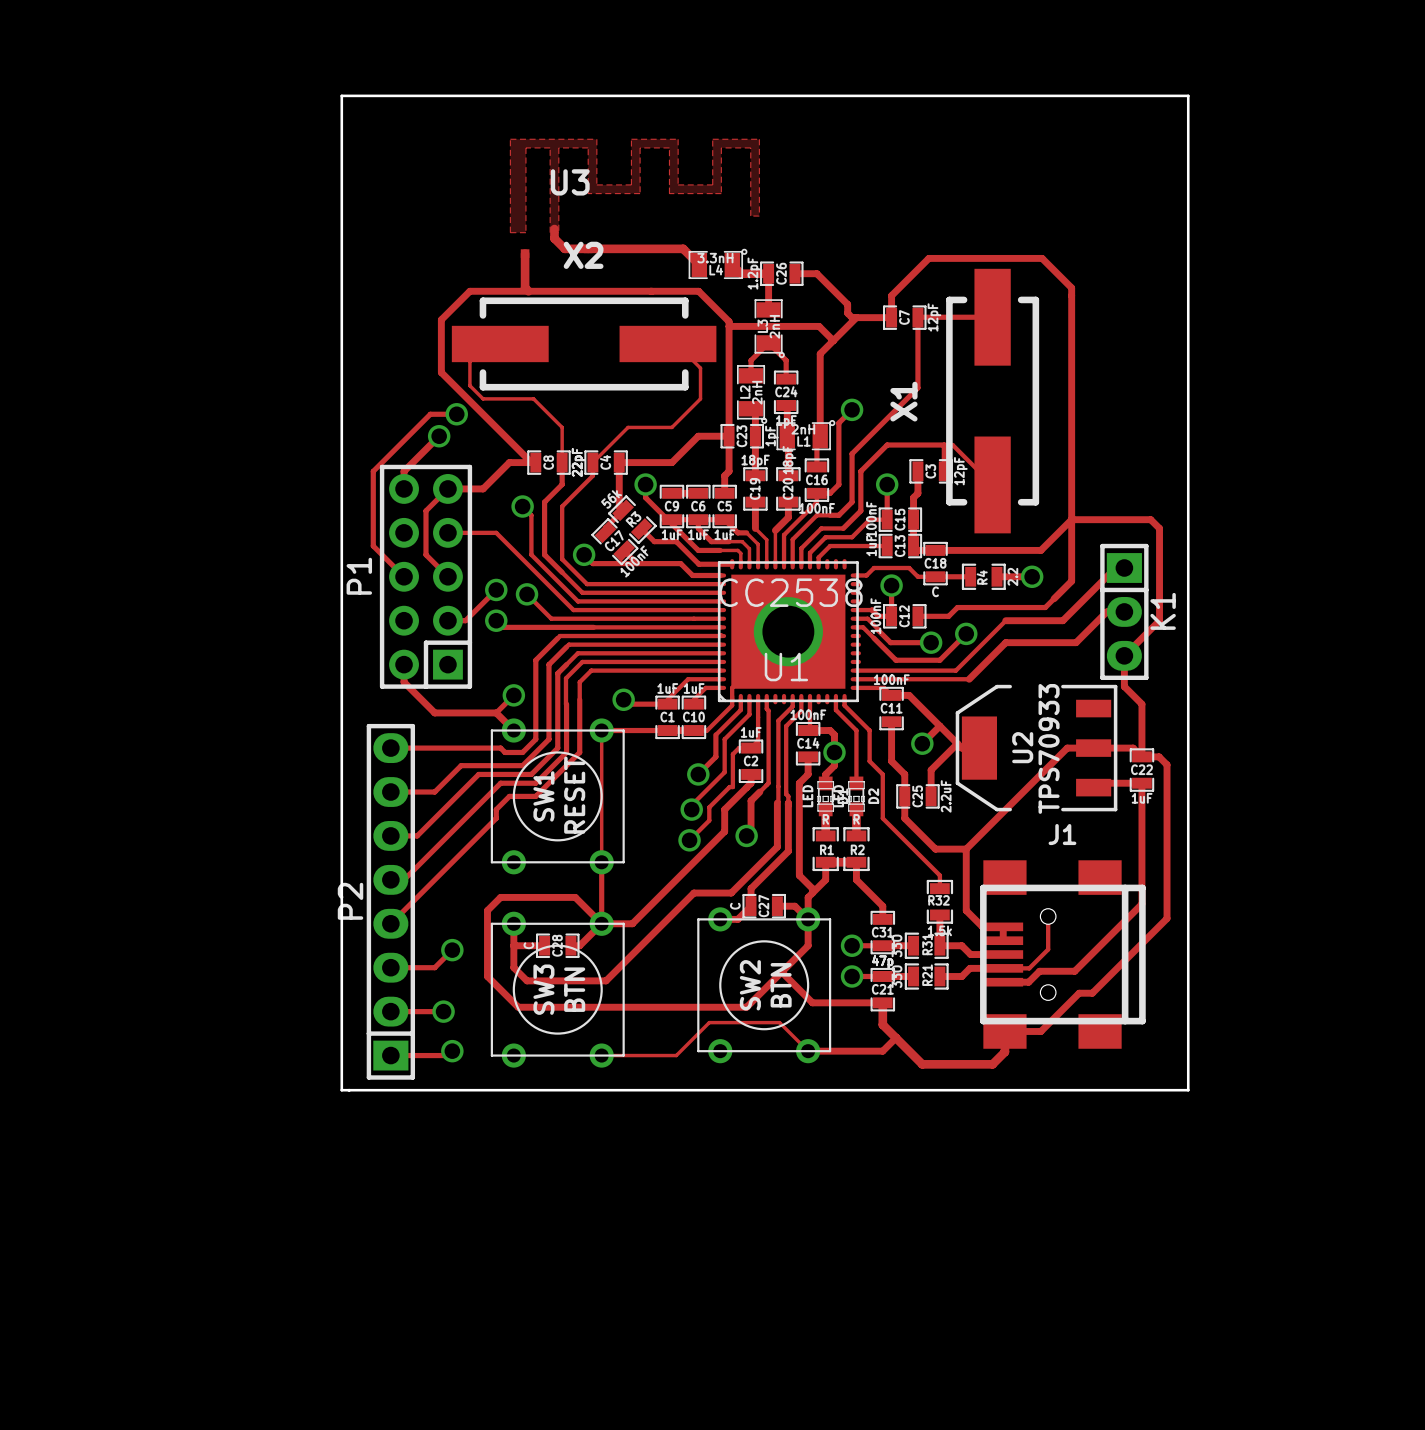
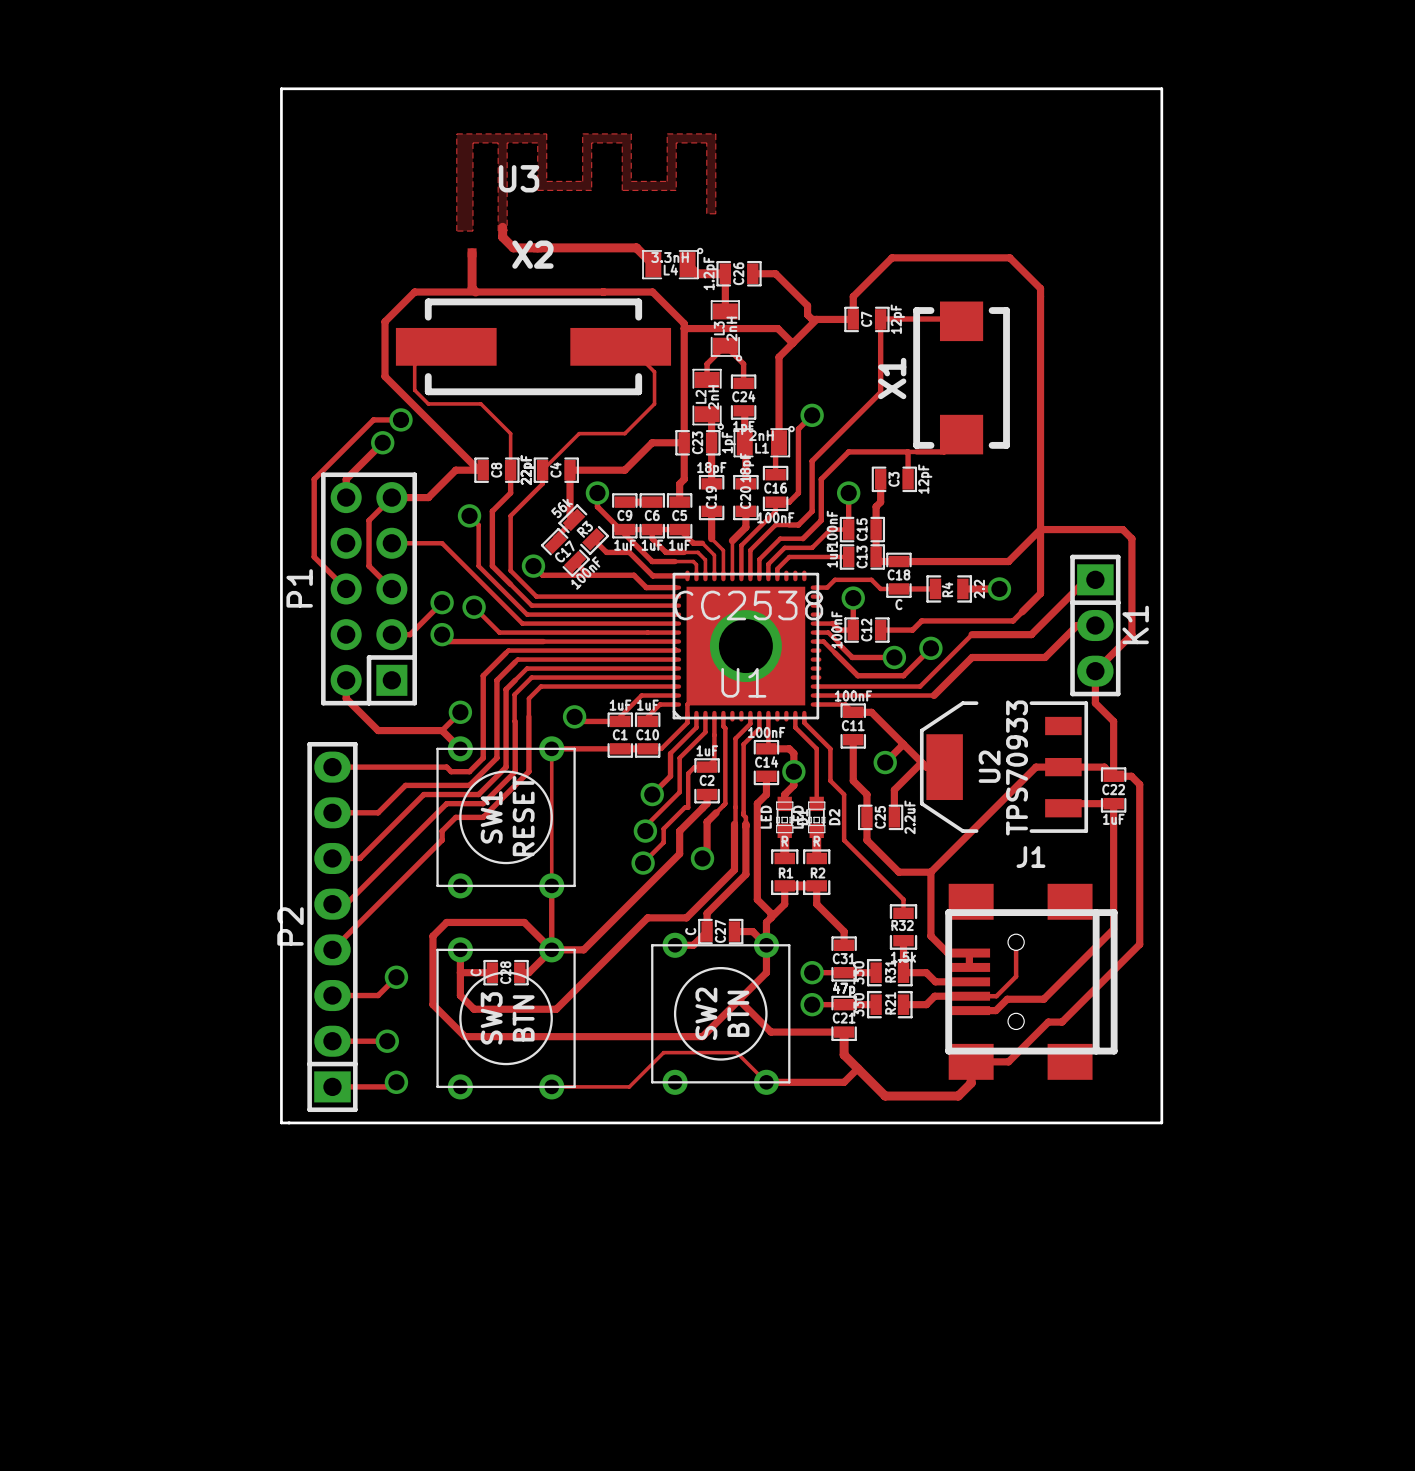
X1 footprint: [946, 268, 1040, 534] -> [913, 301, 1010, 455]
track: (952, 445) (992, 484) -> (916, 451) (944, 451) (961, 434)

